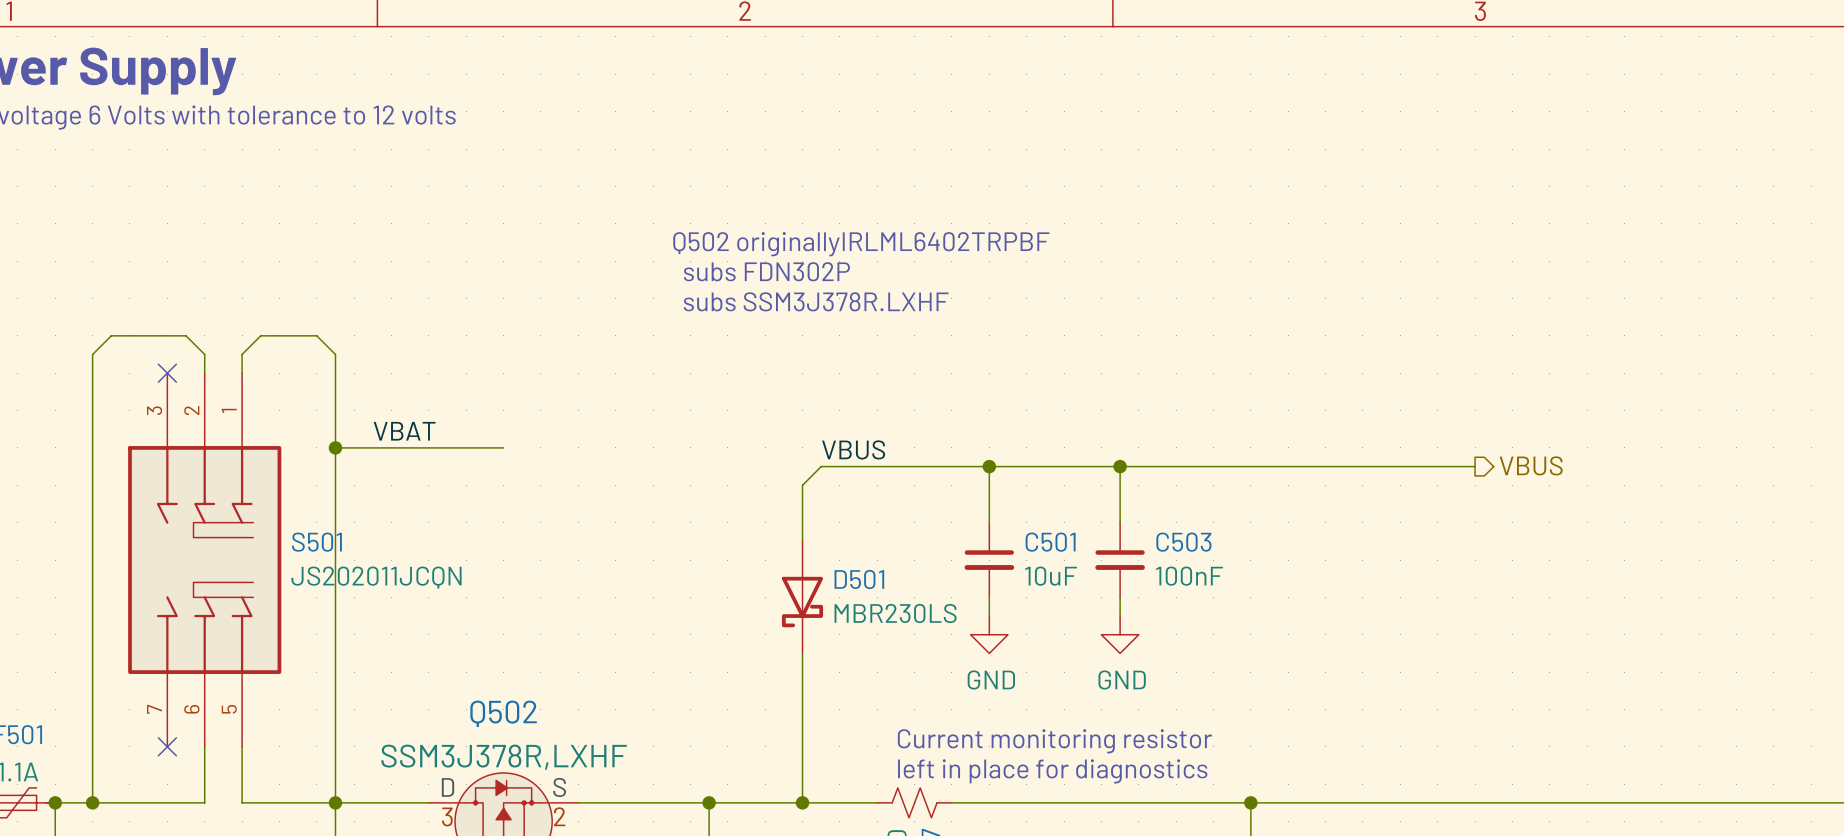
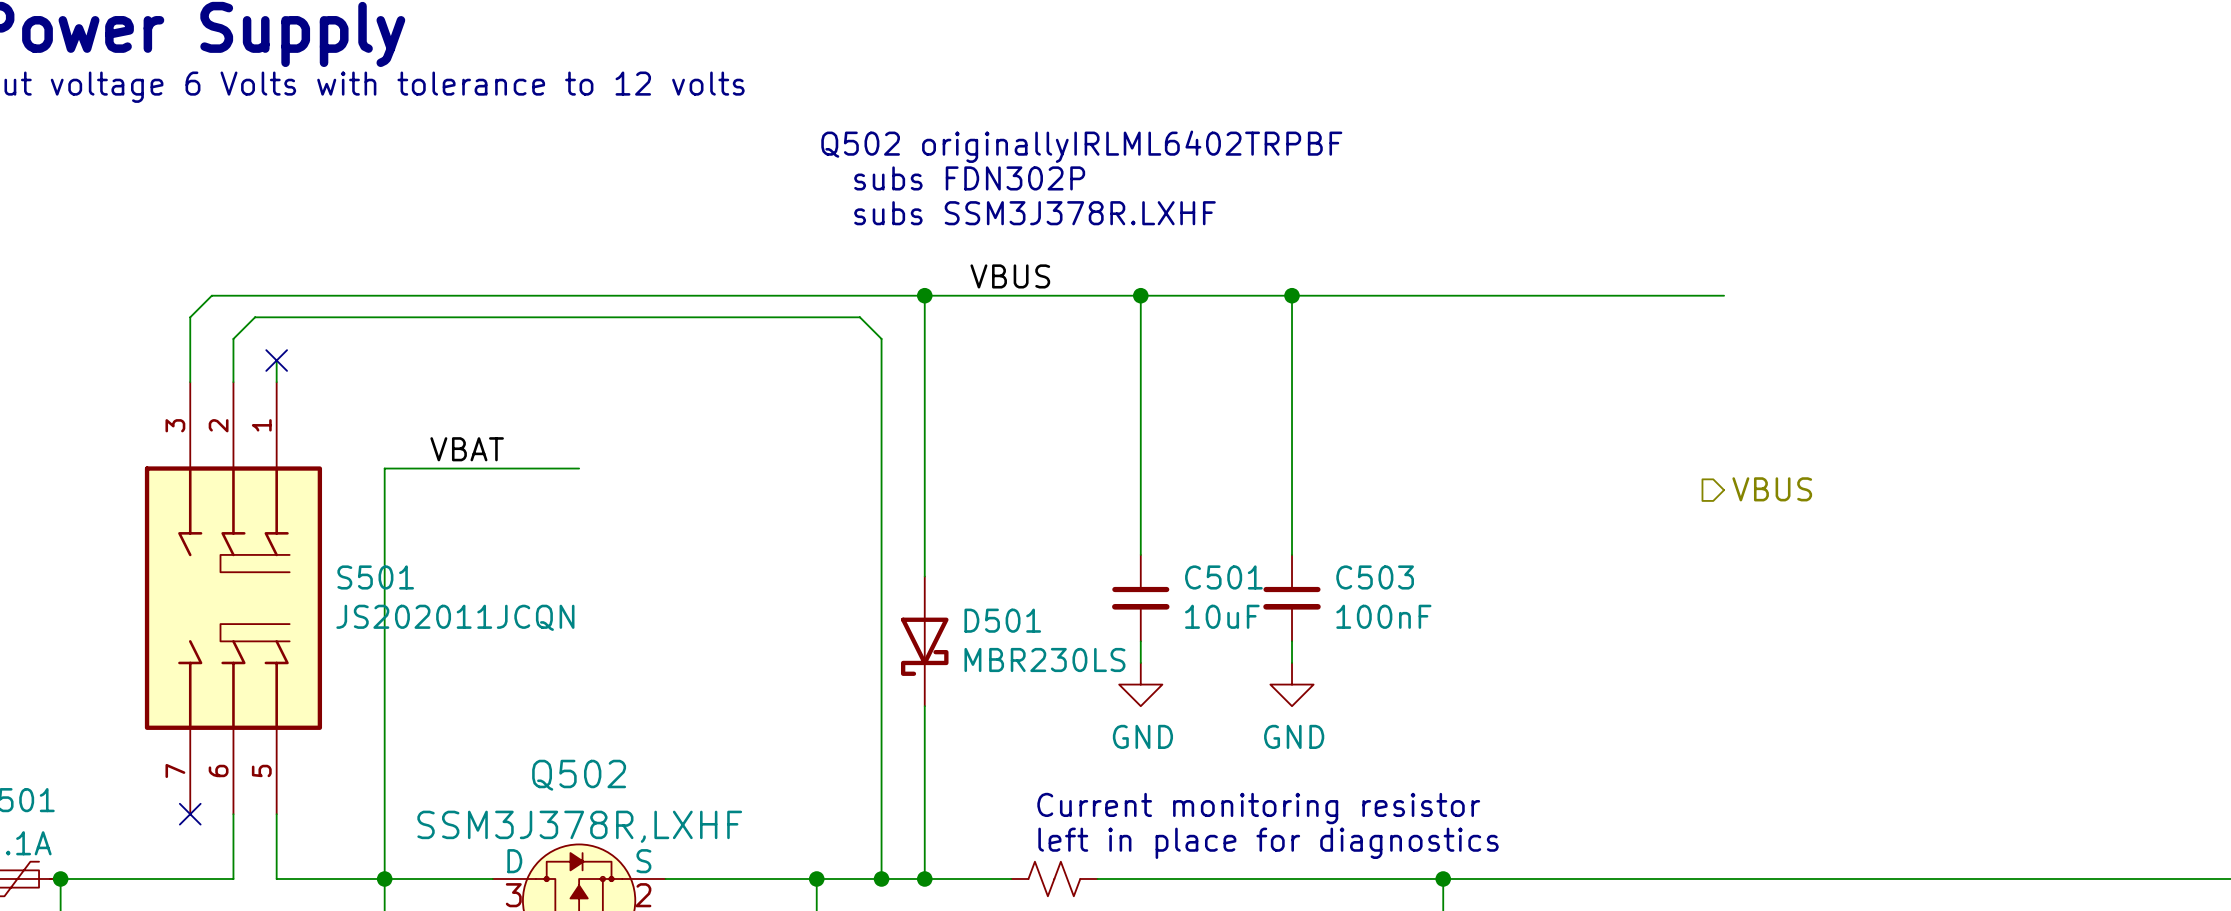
text position: Q502 originallyIRLML6402TRPBF (861, 244) -> Q502 originallyIRLML6402TRPBF (1081, 146)
text position: subs FDN302P (766, 271) -> subs FDN302P (969, 178)
junction: none -> (924, 295)
wire: none -> (1140, 295) (1140, 490)
junction: none -> (1140, 295)
wire: none -> (1292, 295) (1292, 490)
junction: none -> (1292, 295)
wire: none -> (1724, 295) (211, 295) (190, 317) (190, 382)
text position: subs SSM3J378R.LXHF (816, 301) -> subs SSM3J378R.LXHF (1034, 213)
wire: (204, 354) (186, 335) (111, 335) (92, 354) (92, 802) -> (233, 360) (233, 338) (255, 317) (859, 317) (881, 338) (881, 878)
wire: (242, 354) (260, 335) (316, 335) (335, 354) (335, 447) -> none
no-connect mark position: (167, 373) -> (276, 360)
junction: (335, 447) -> none
label position: VBUS (853, 449) -> VBUS (1010, 276)
junction: (989, 466) -> none
junction: (1120, 466) -> none
wire: (1475, 466) (821, 466) (802, 485) -> (924, 295) (924, 511)
junction: (92, 802) -> none
junction: none -> (881, 878)

